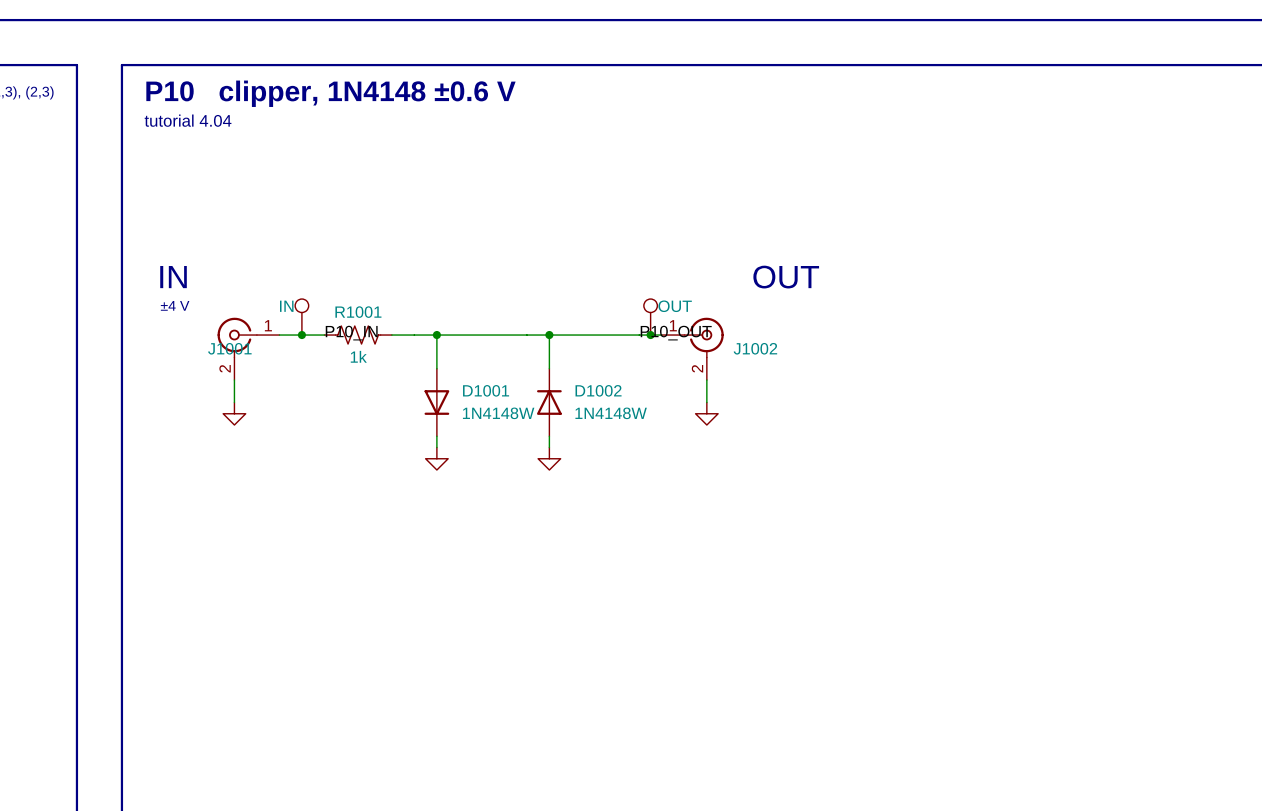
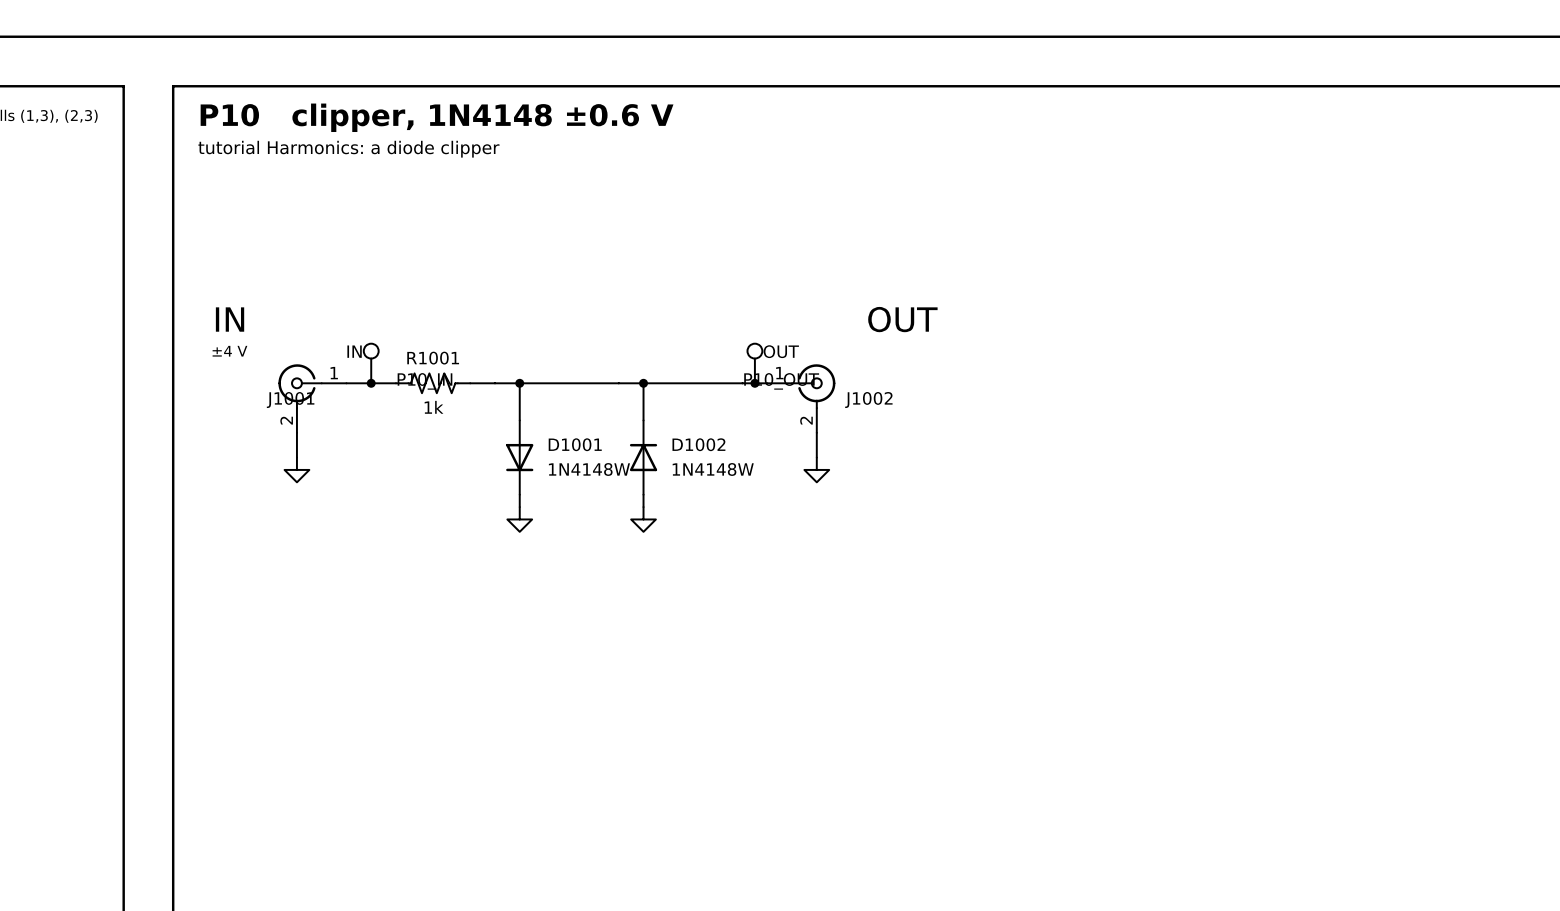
text: tutorial 4.04 (188, 120) -> tutorial Harmonics: a diode clipper (348, 149)

